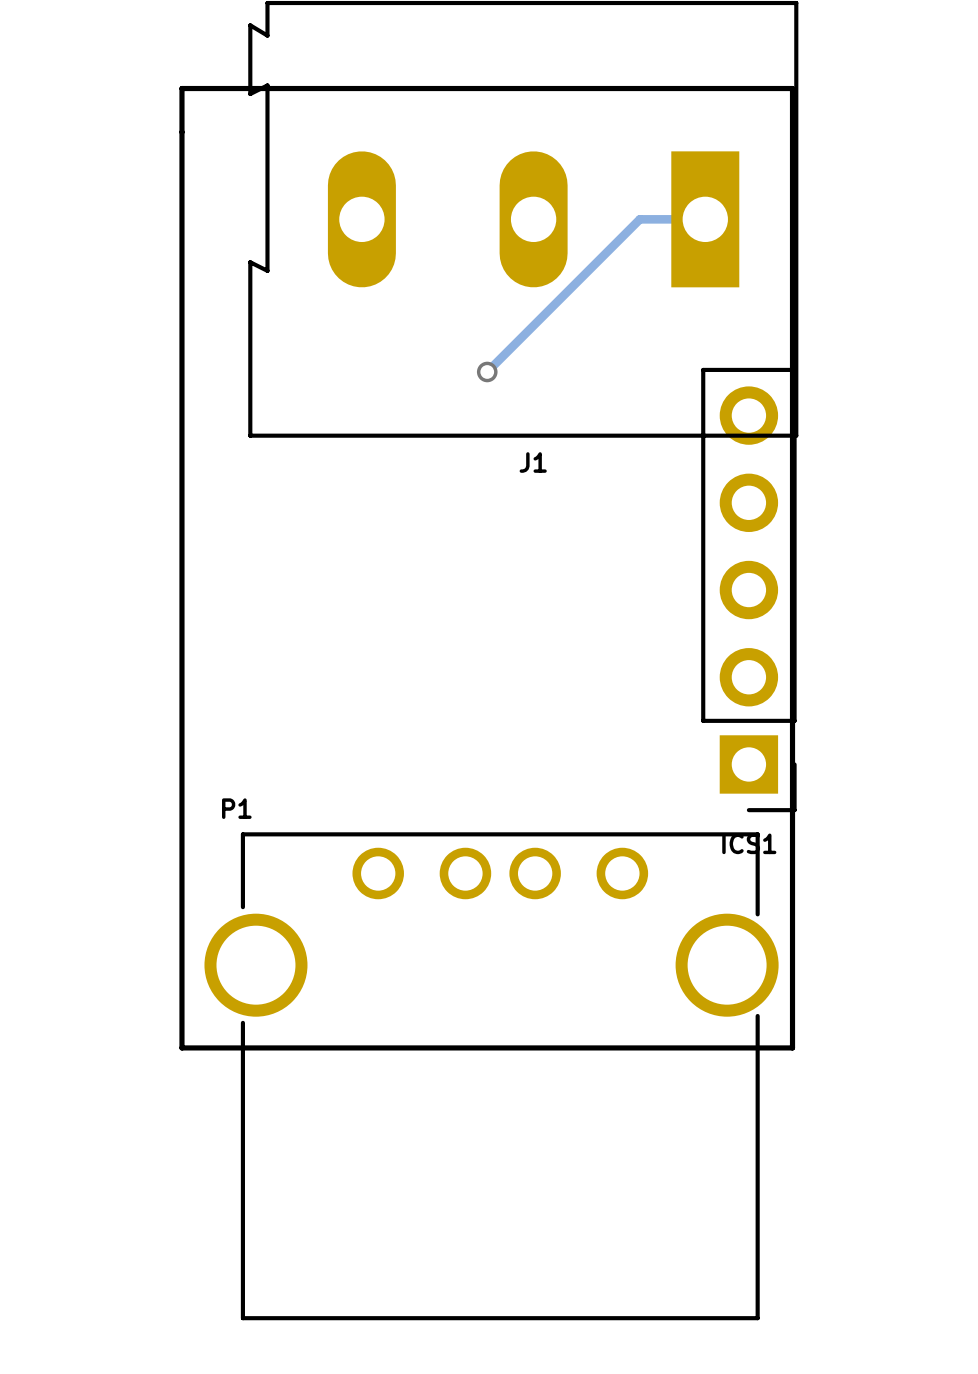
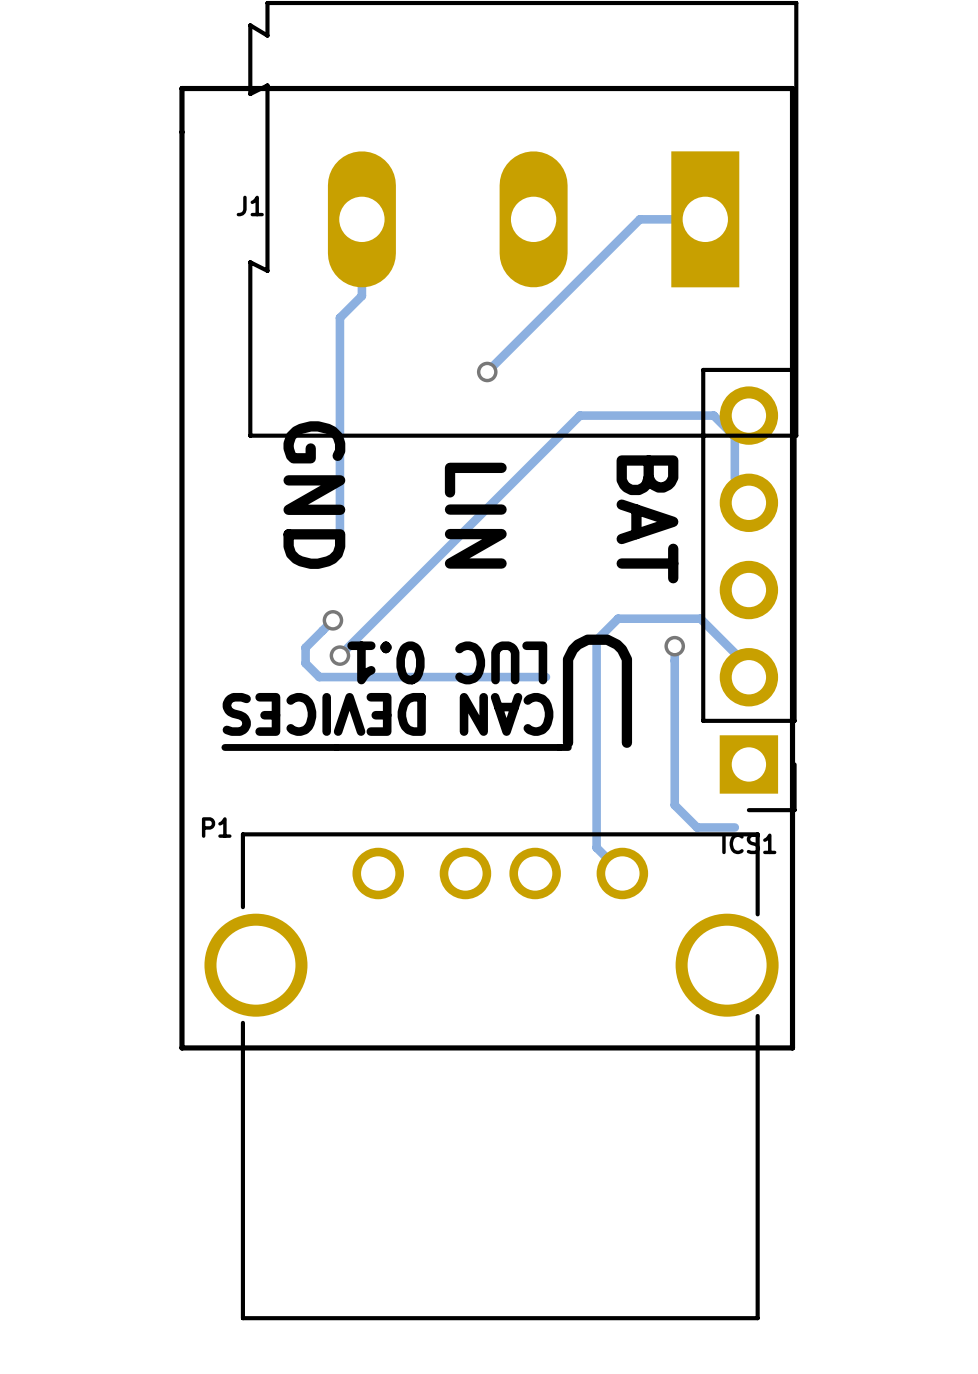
track: none -> (361, 219) (361, 295) (339, 317) (339, 543)
J1 name position: J1 (533, 462) -> J1 (250, 206)
track: none -> (734, 478) (734, 436) (713, 415) (579, 415) (339, 655)
text: none -> GND (314, 495)
text: none -> LIN (475, 515)
text: none -> BAT (647, 519)
track: none -> (332, 620) (305, 647) (305, 663) (319, 677) (545, 677)
via: none -> (332, 620)
track: none -> (674, 646) (674, 805) (697, 827) (734, 827)
via: none -> (674, 646)
track: none -> (734, 653) (700, 618) (618, 618) (596, 640) (596, 847) (622, 873)
via: none -> (339, 655)
text: none -> LUC 0.1 (447, 662)
text: none -> U (597, 691)
text: none -> CAN DEVICES (388, 714)
line: none -> (568, 747) (224, 747)
P1 name position: P1 (236, 808) -> P1 (216, 827)

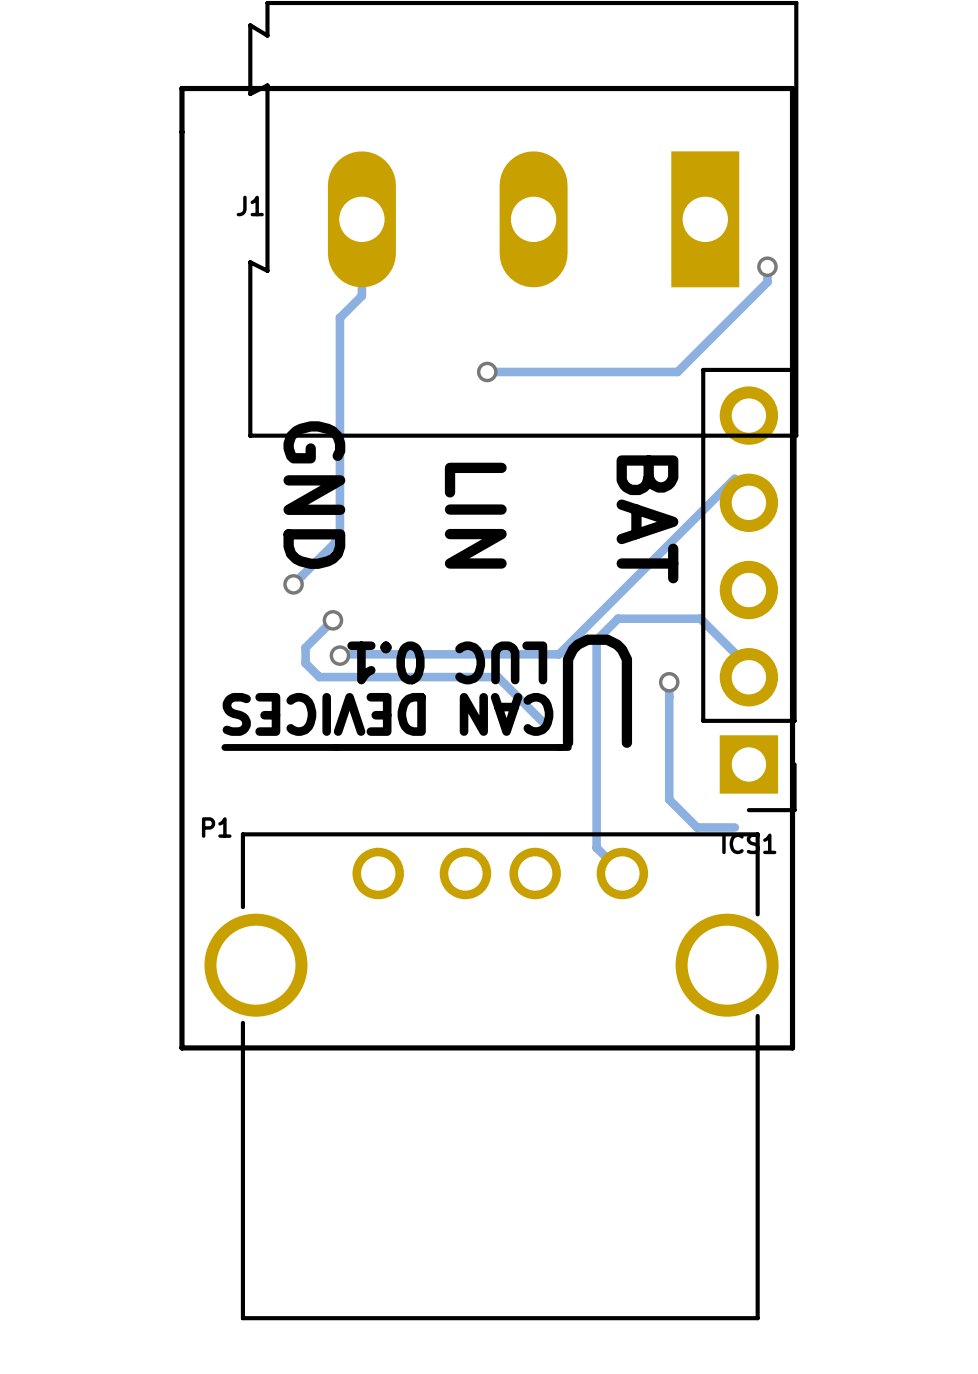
track: (705, 219) (639, 219) (487, 371) -> (767, 266) (767, 282) (677, 371) (487, 371)
via: none -> (767, 266)
track: (734, 478) (734, 436) (713, 415) (579, 415) (339, 655) -> (734, 478) (559, 654) (334, 654)
track: none -> (339, 543) (334, 543) (293, 584)
via: none -> (293, 584)
track: (674, 646) (674, 805) -> (669, 682) (669, 799) (674, 805)
via position: (674, 646) -> (669, 682)
track: (545, 677) (497, 677) -> (542, 721) (497, 677)

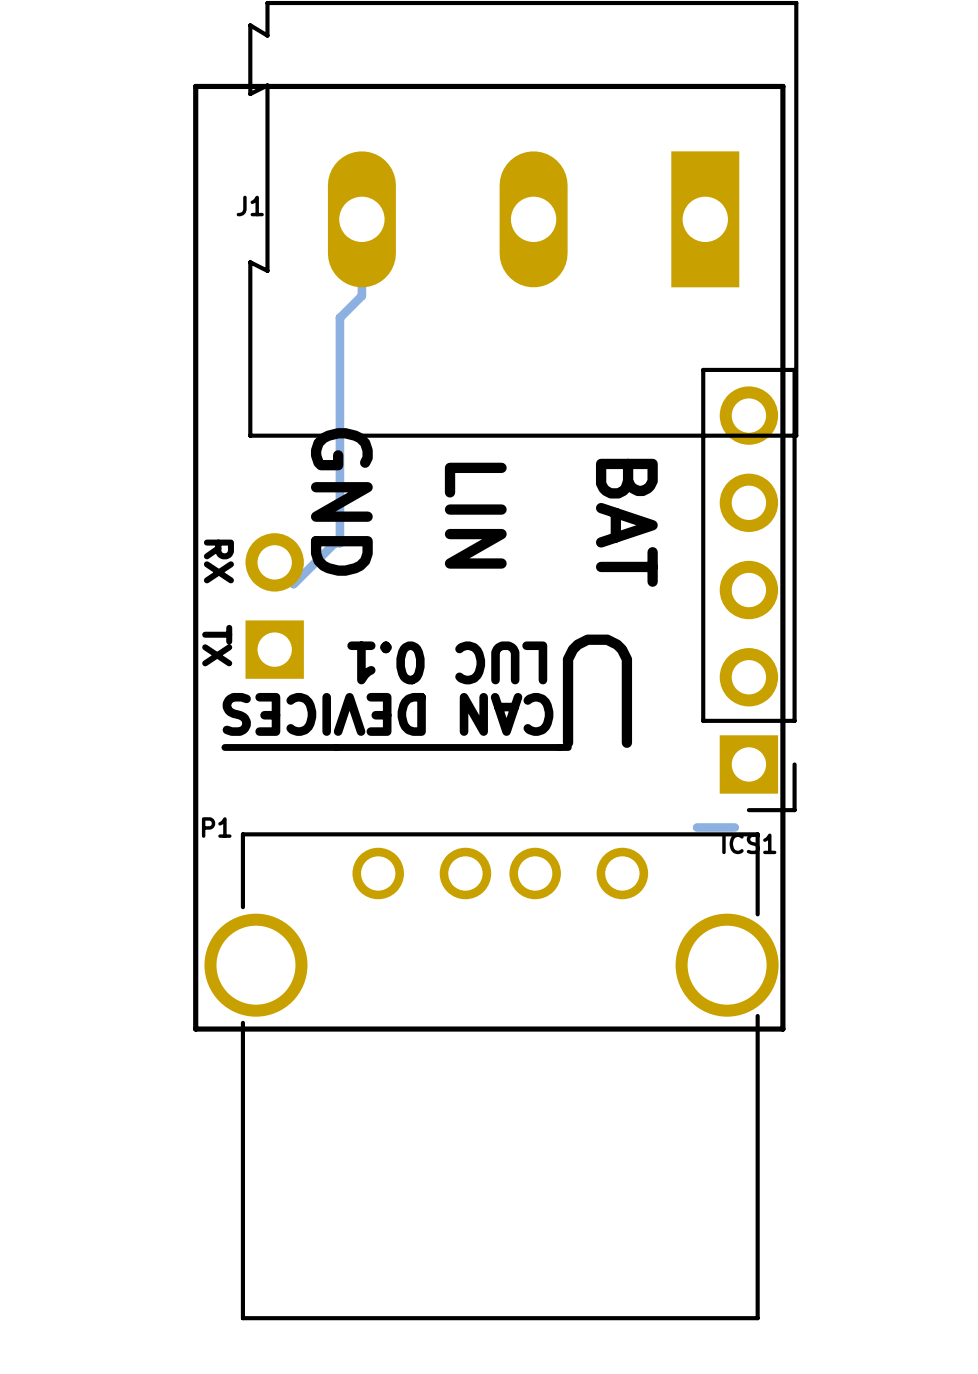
board edge: (792, 88) (792, 1047) (181, 1047) (181, 88) (792, 88) -> (782, 86) (782, 1029) (195, 1029) (195, 86) (782, 86)
track: (767, 266) (767, 282) (677, 371) (487, 371) -> none
via: (767, 266) -> none
via: (487, 371) -> none
track: (734, 478) (559, 654) (334, 654) -> none
text position: GND (314, 495) -> GND (341, 501)
text position: BAT (647, 519) -> BAT (626, 522)
text: none -> RX (218, 561)
via: (293, 584) -> none
part: none -> (274, 606)
track: (332, 620) (305, 647) (305, 663) (319, 677) (497, 677) (542, 721) -> none
via: (332, 620) -> none
text: none -> TX (217, 645)
track: (734, 653) (700, 618) (618, 618) (596, 640) (596, 847) (622, 873) -> none
via: (339, 655) -> none
track: (669, 682) (669, 799) (697, 827) -> none
via: (669, 682) -> none

